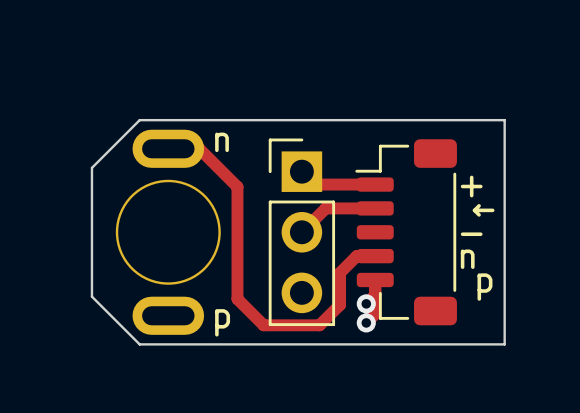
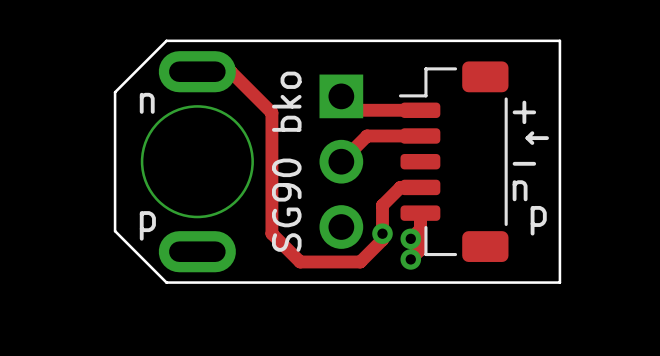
part footprint: [268, 138, 336, 327] -> [319, 74, 364, 249]
text position: n (222, 142) -> n (147, 103)
text: none -> SG90 bko (286, 161)
via: none -> (382, 233)
text position: p (222, 322) -> p (147, 225)

